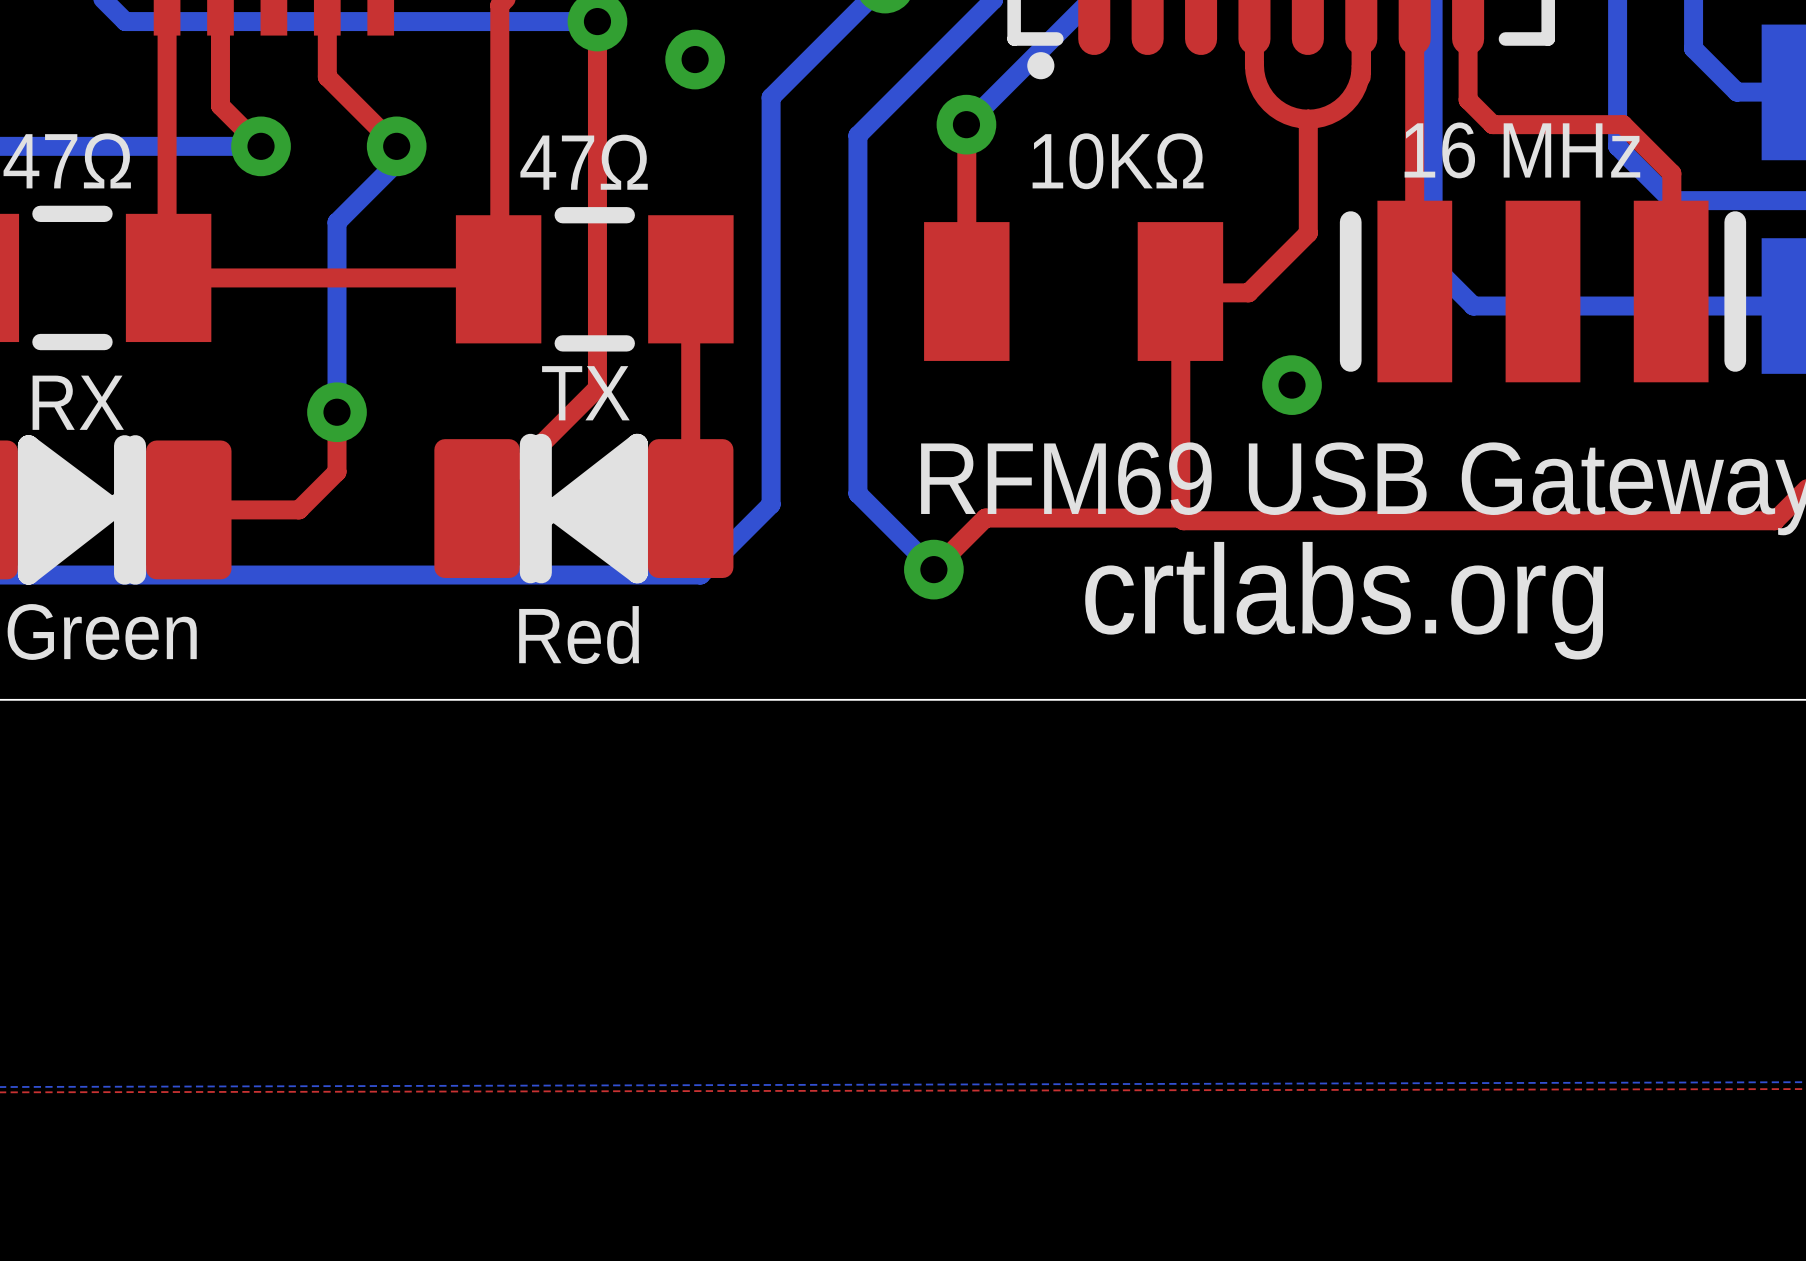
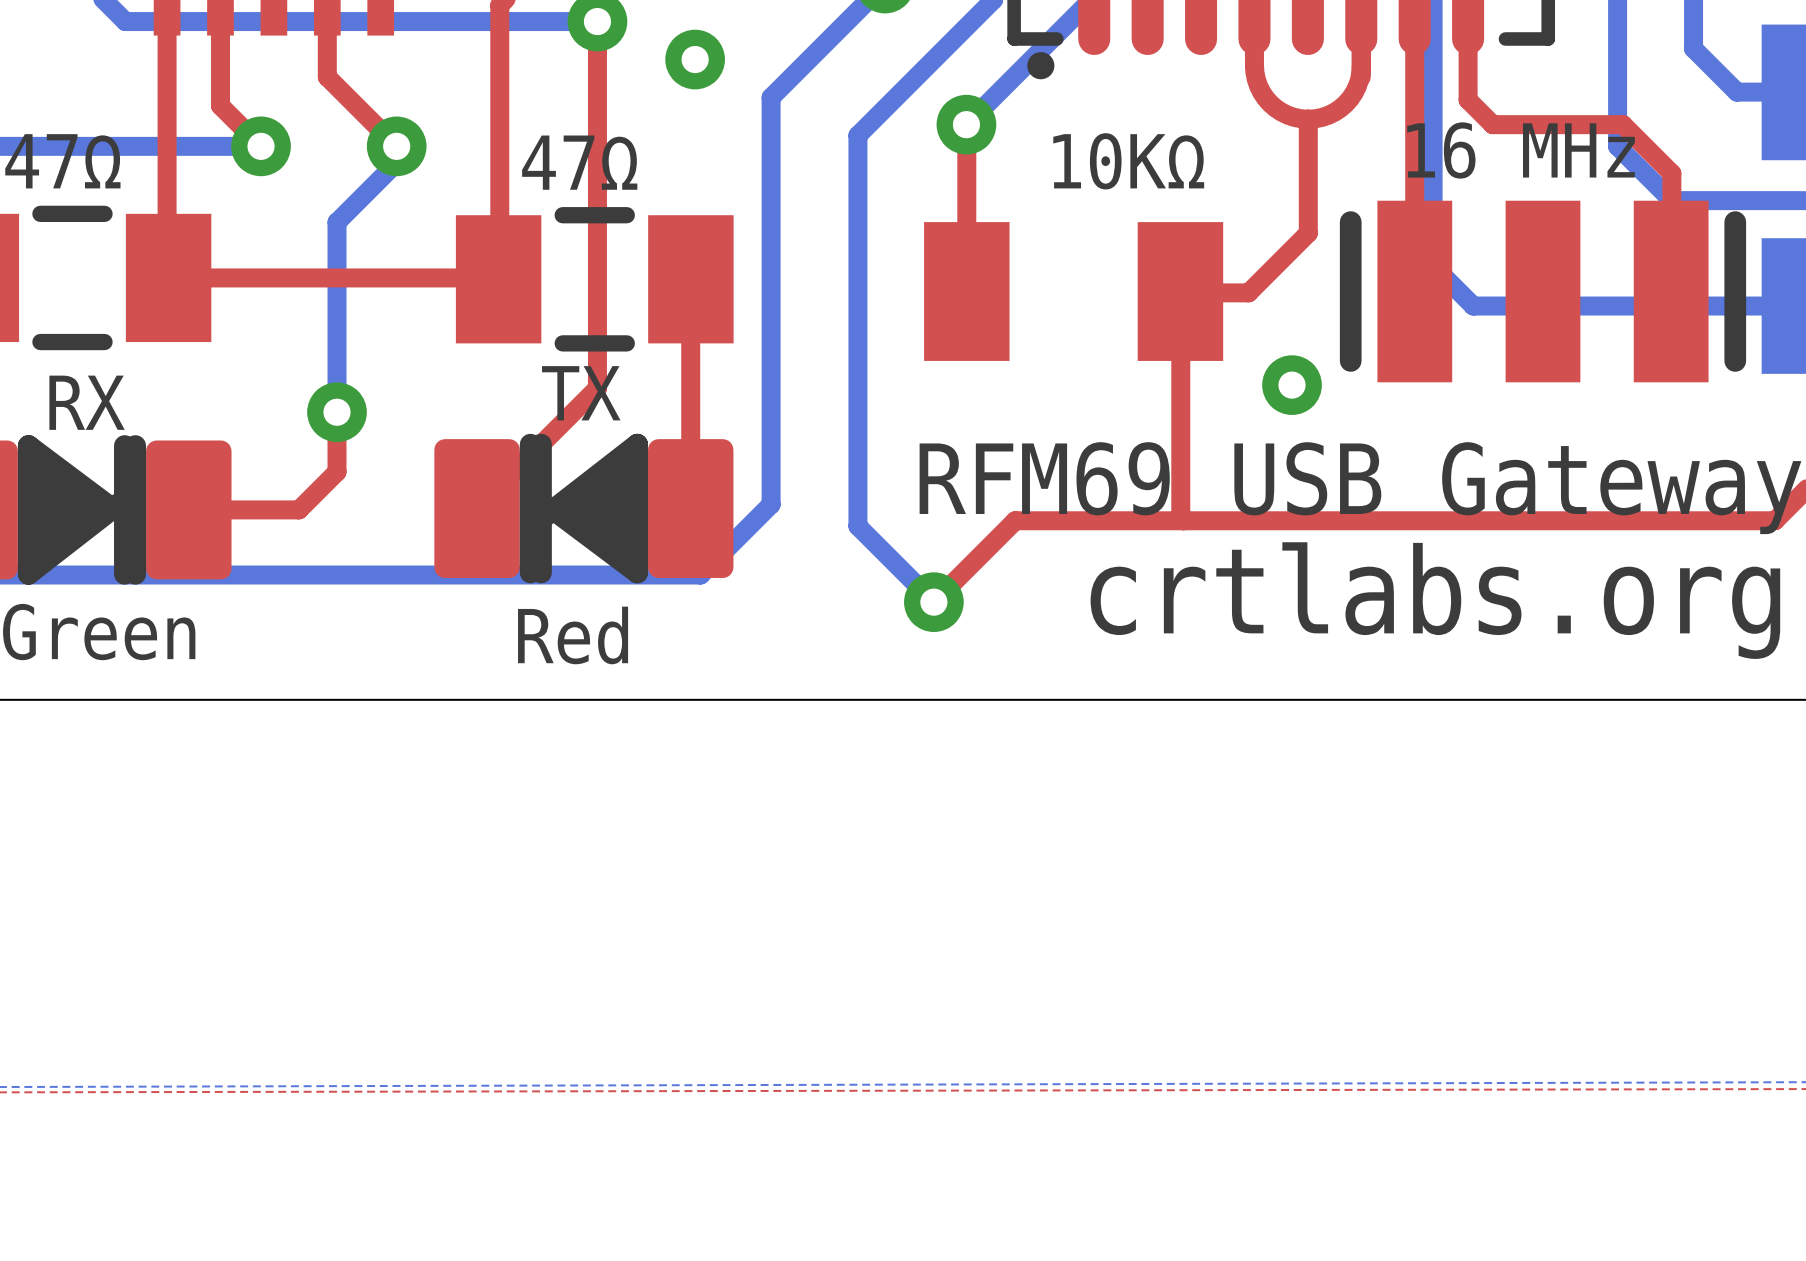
bottom track: (857, 493) (933, 569) -> (857, 493) (857, 526) (933, 602)
top track: (1180, 518) (985, 518) (933, 569) -> (1183, 520) (1015, 520) (933, 602)
via position: (933, 569) -> (933, 602)

